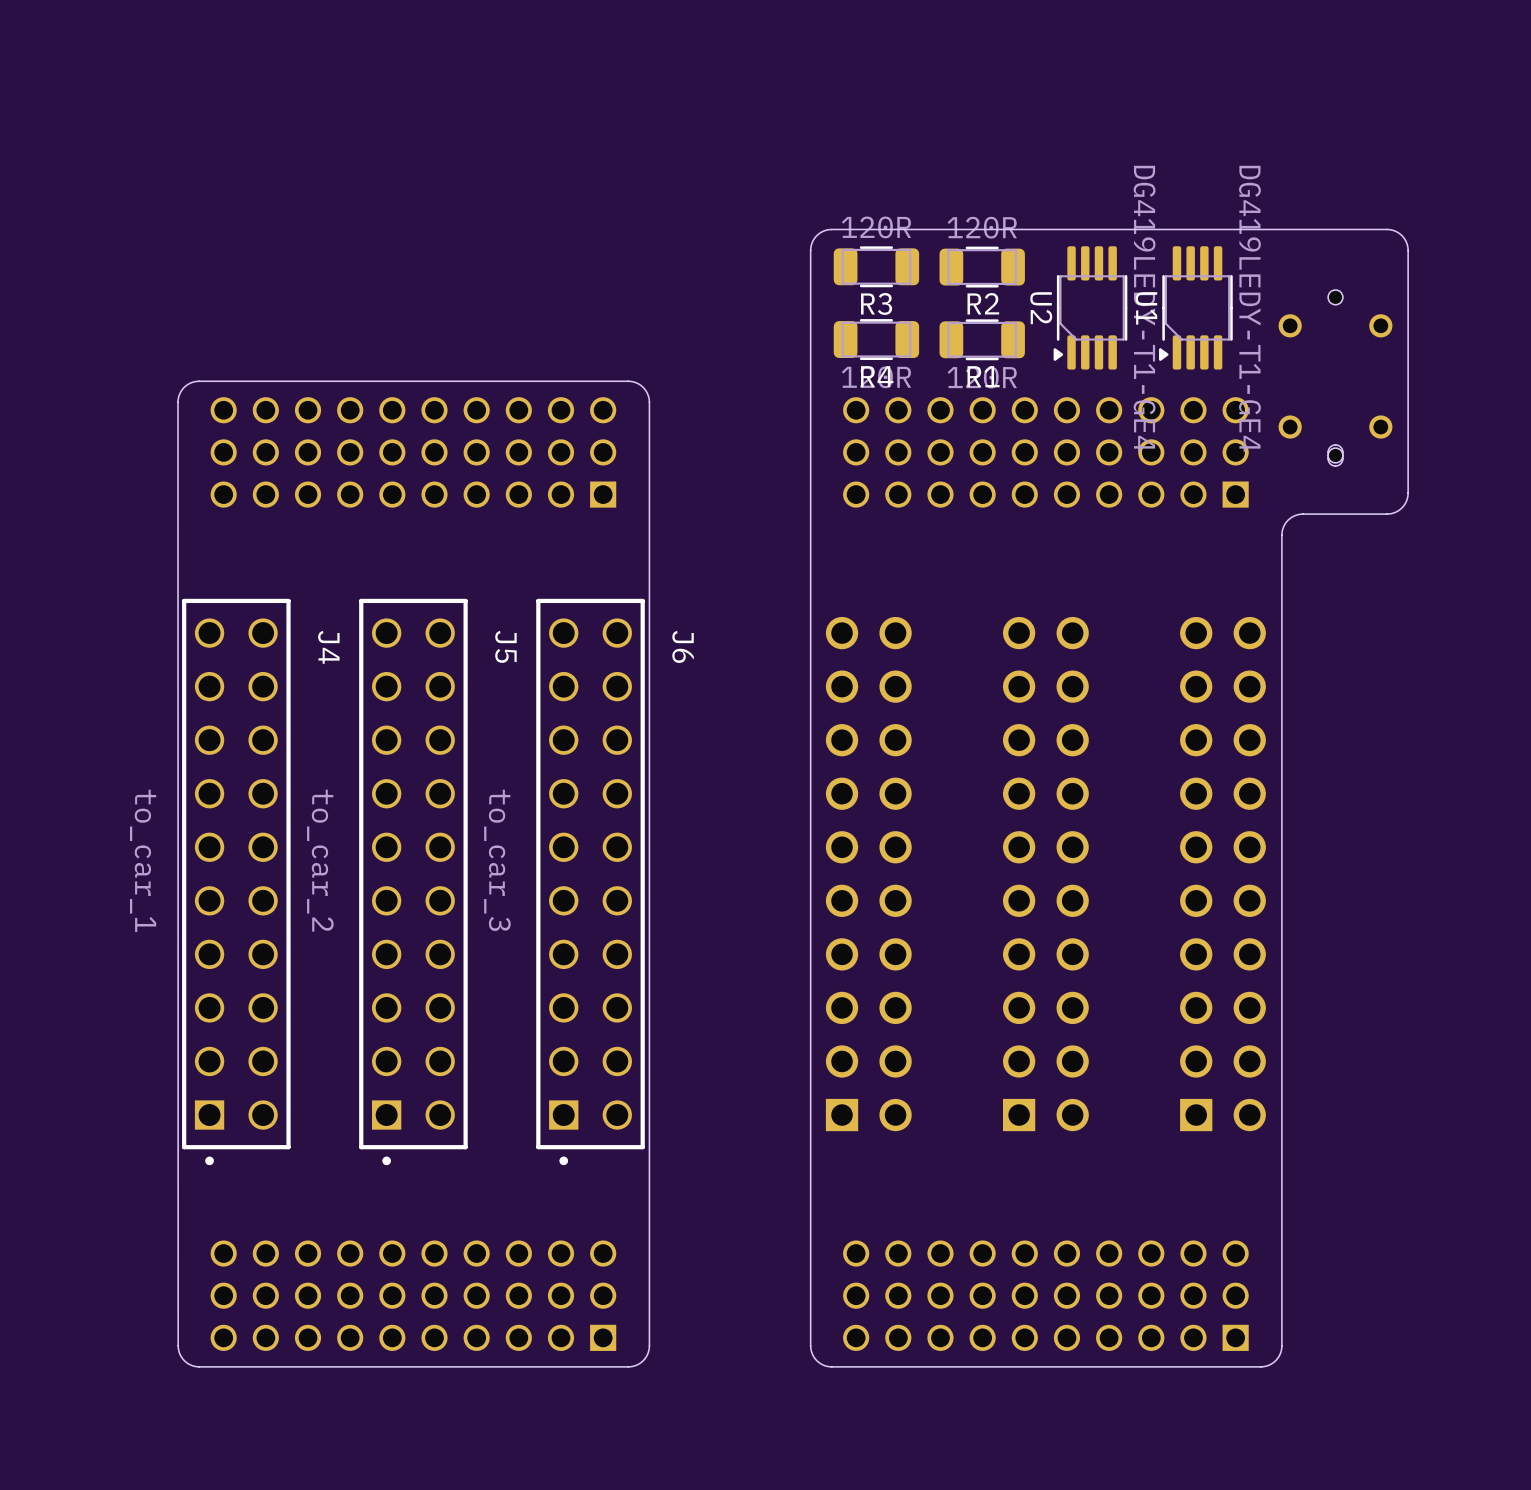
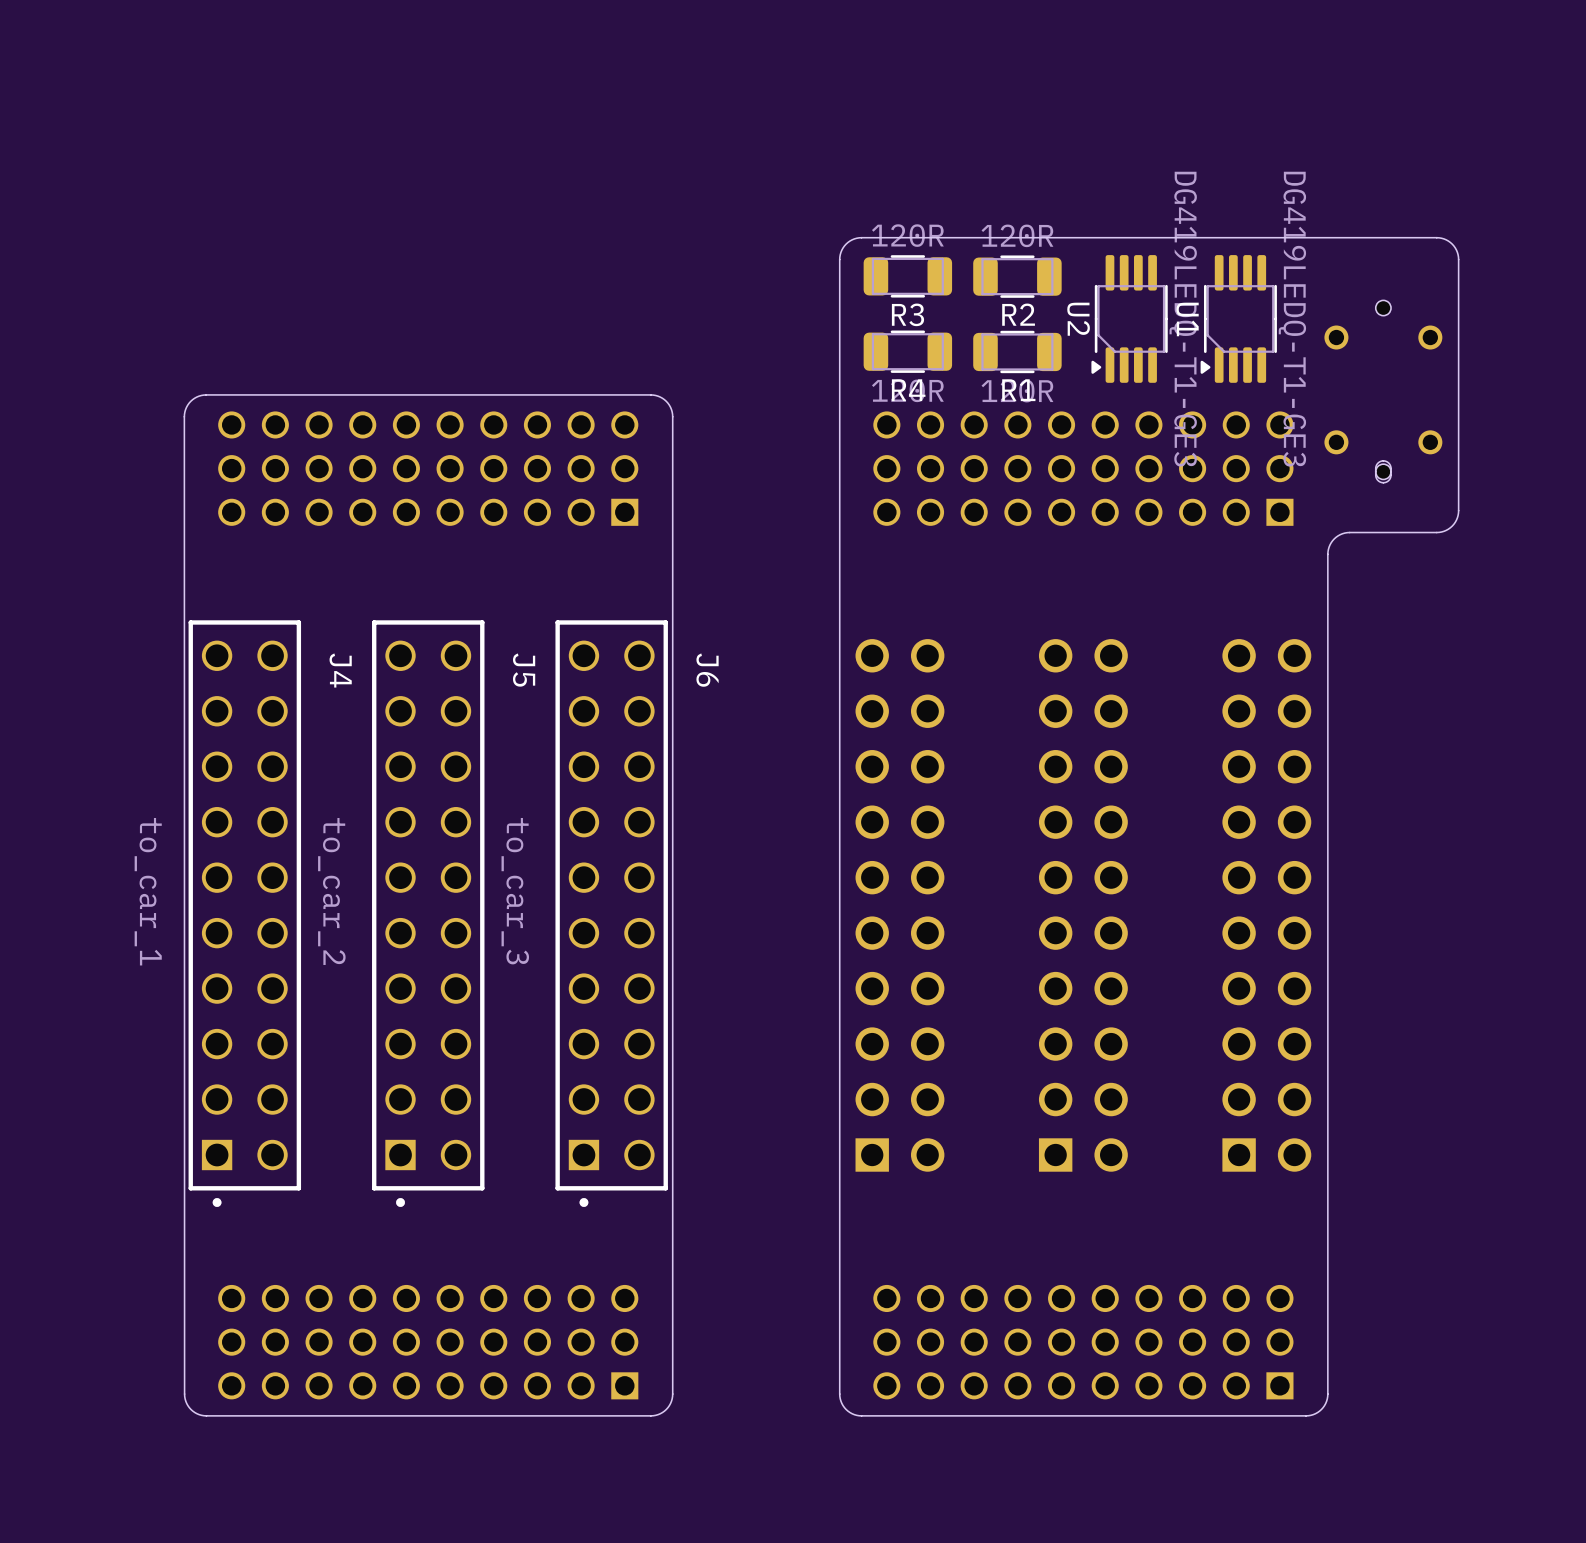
U2 value: DG419LEDY-T1-GE4 (1144, 308) -> DG419LEDQ-T1-GE3 (1183, 319)
U1 value: DG419LEDY-T1-GE4 (1249, 308) -> DG419LEDQ-T1-GE3 (1292, 319)

